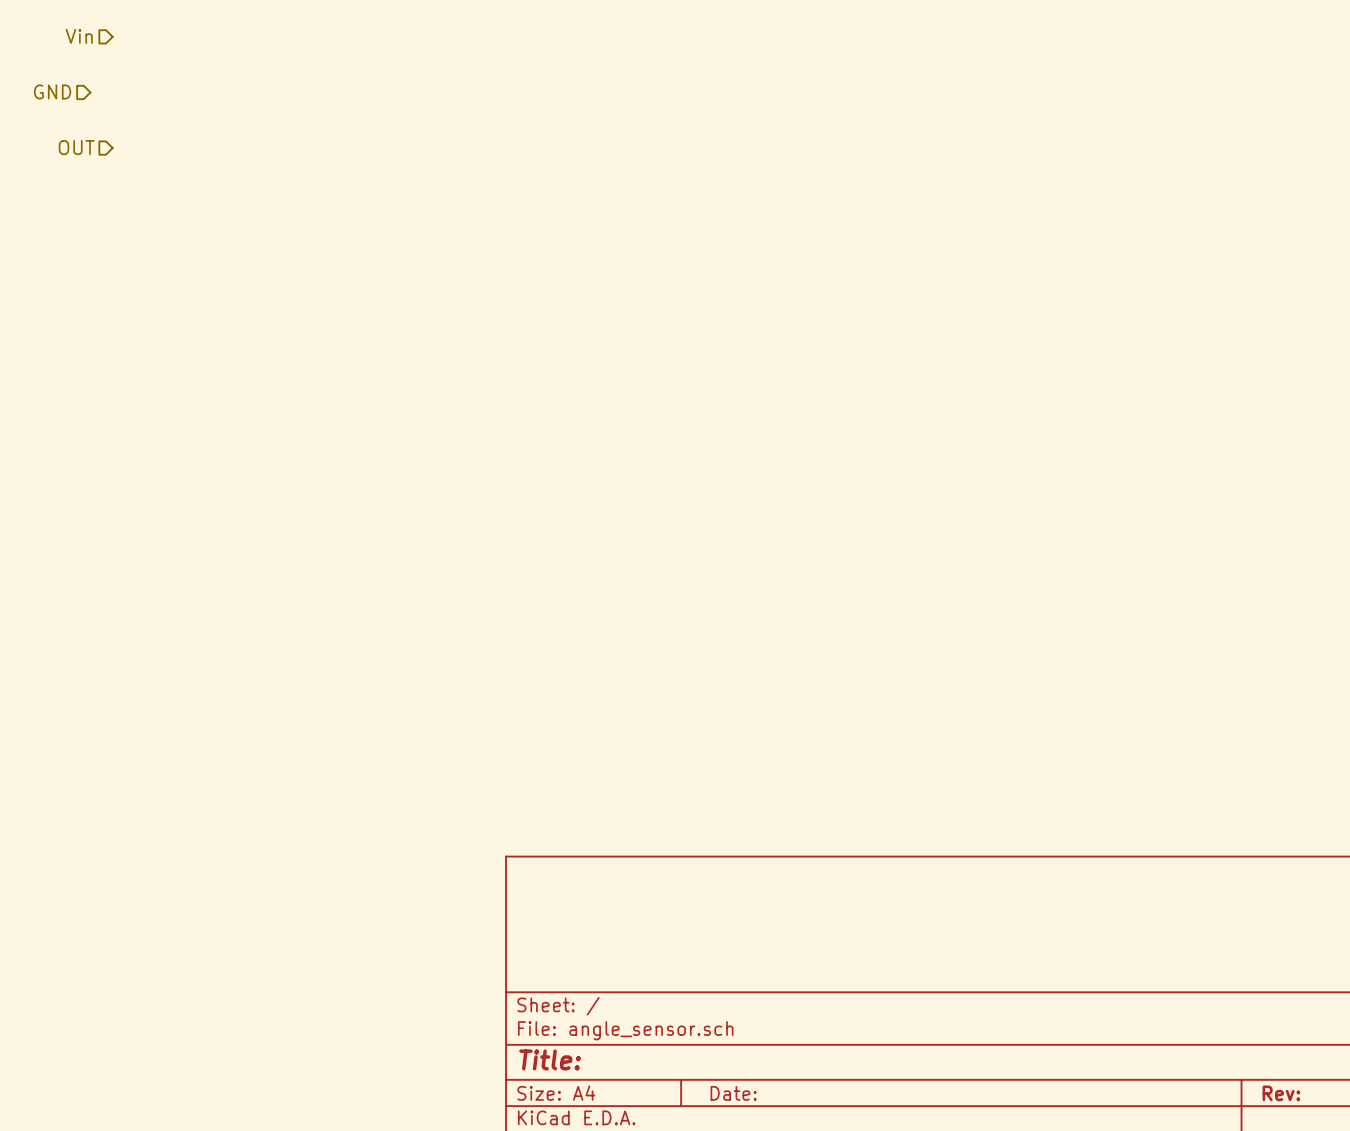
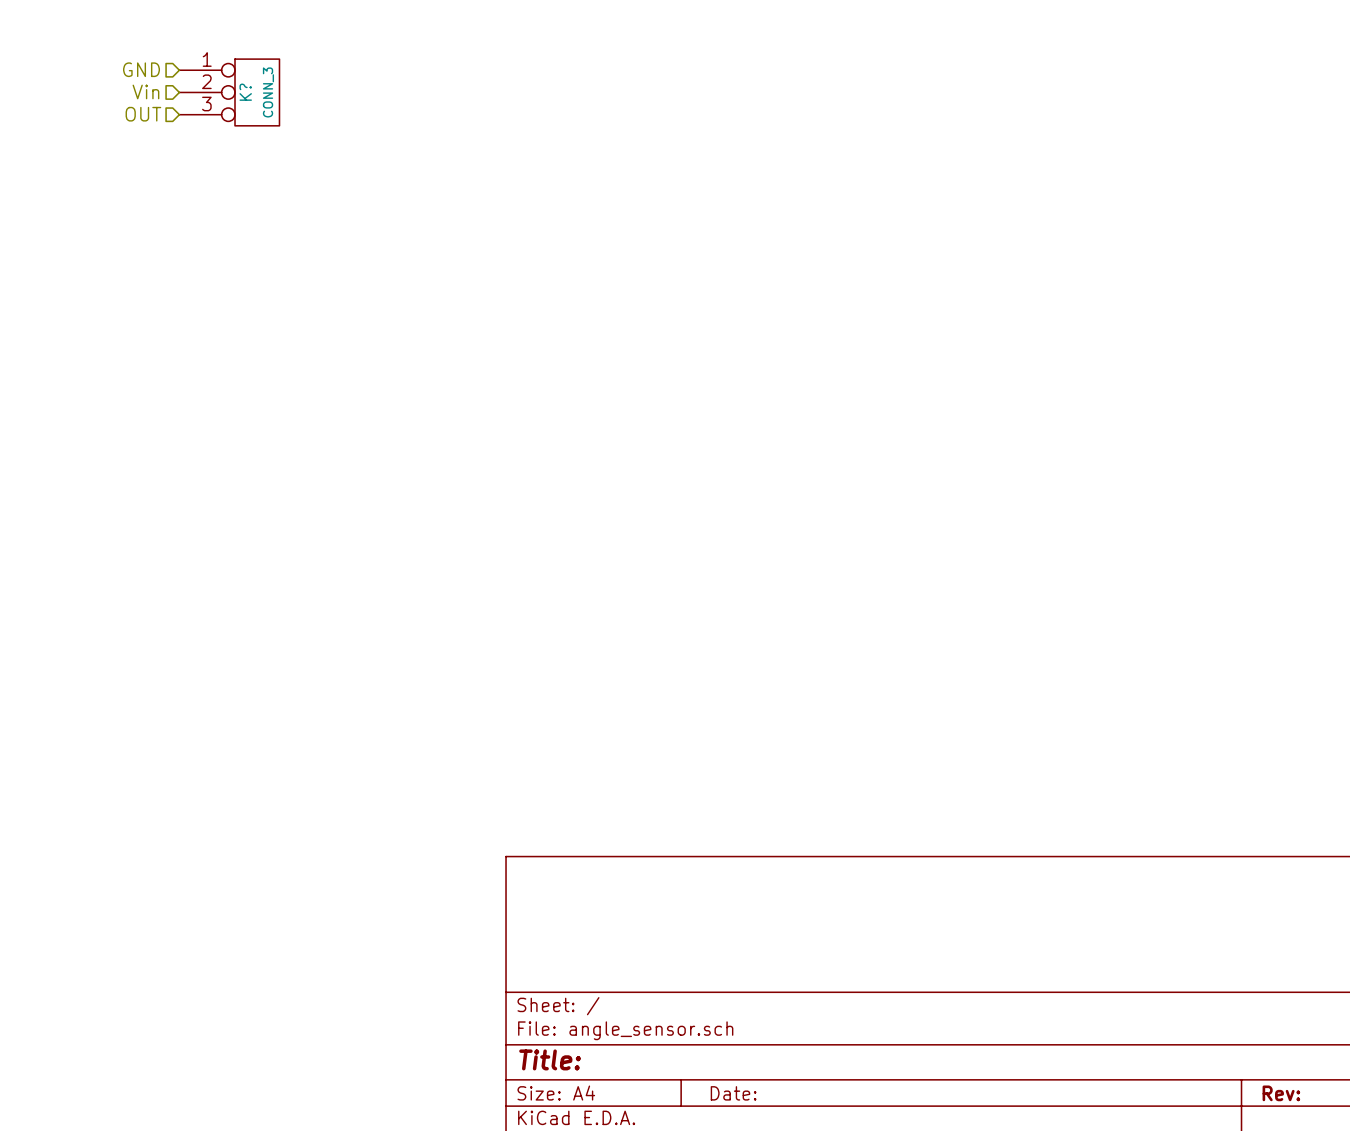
hierarchical label position: Vin (79, 36) -> Vin (145, 91)
hierarchical label position: GND (52, 91) -> GND (141, 69)
K?: none -> CONN_3 (229, 92)
hierarchical label position: OUT (76, 147) -> OUT (143, 114)

